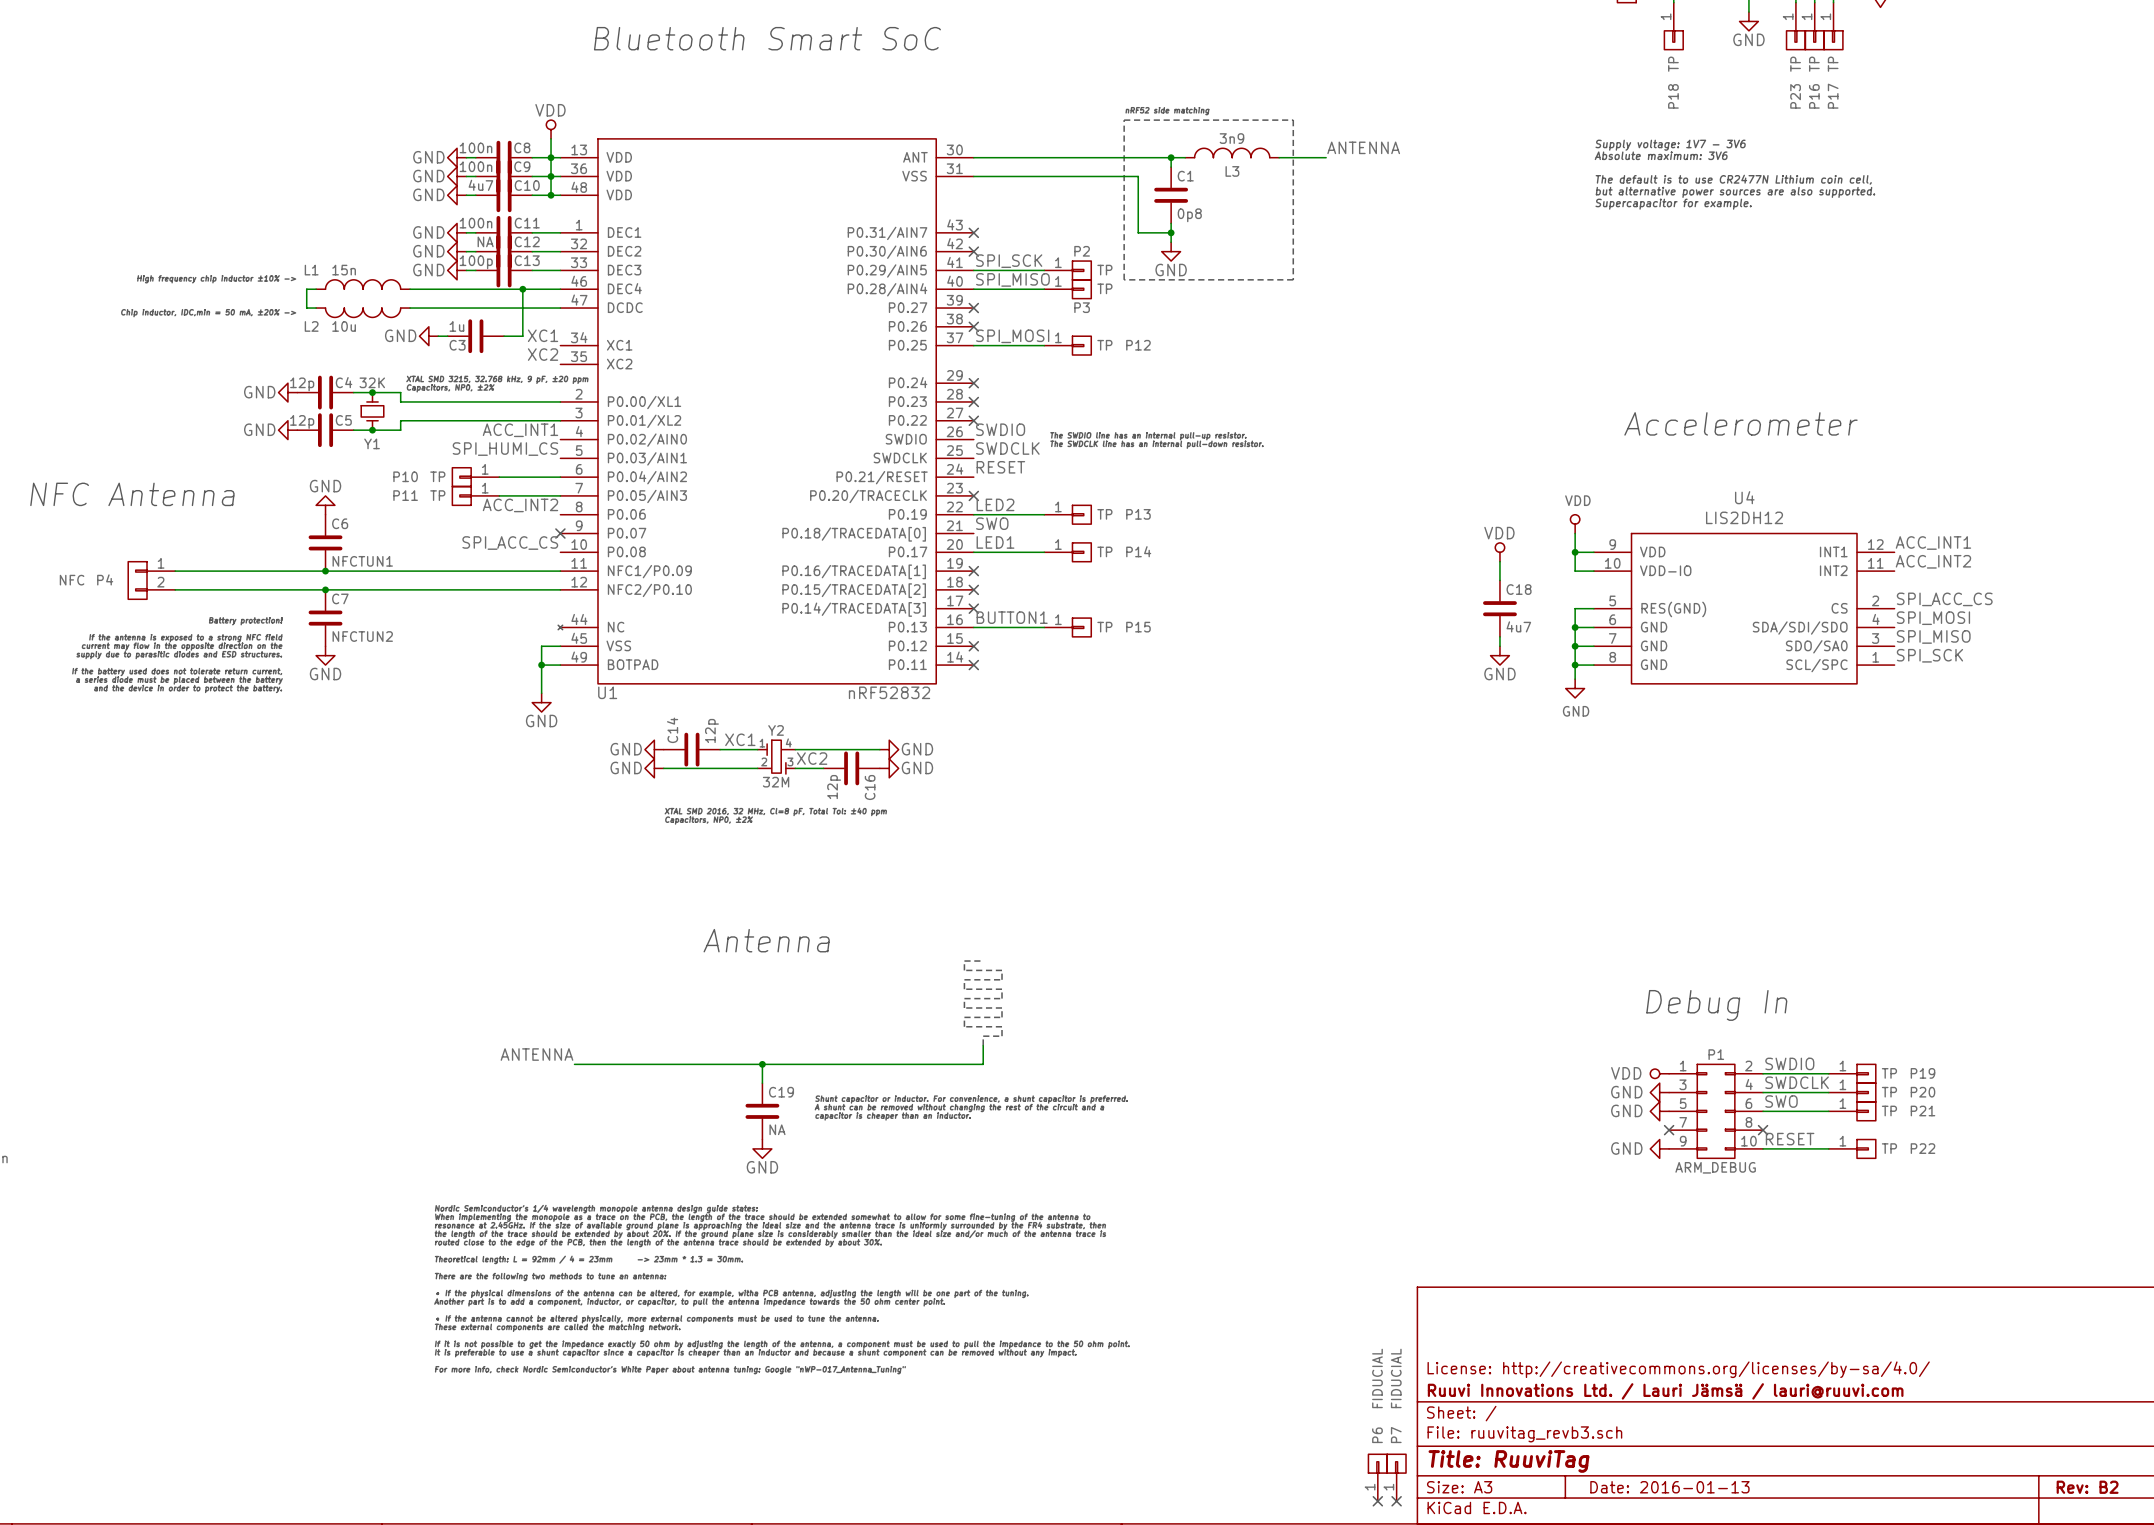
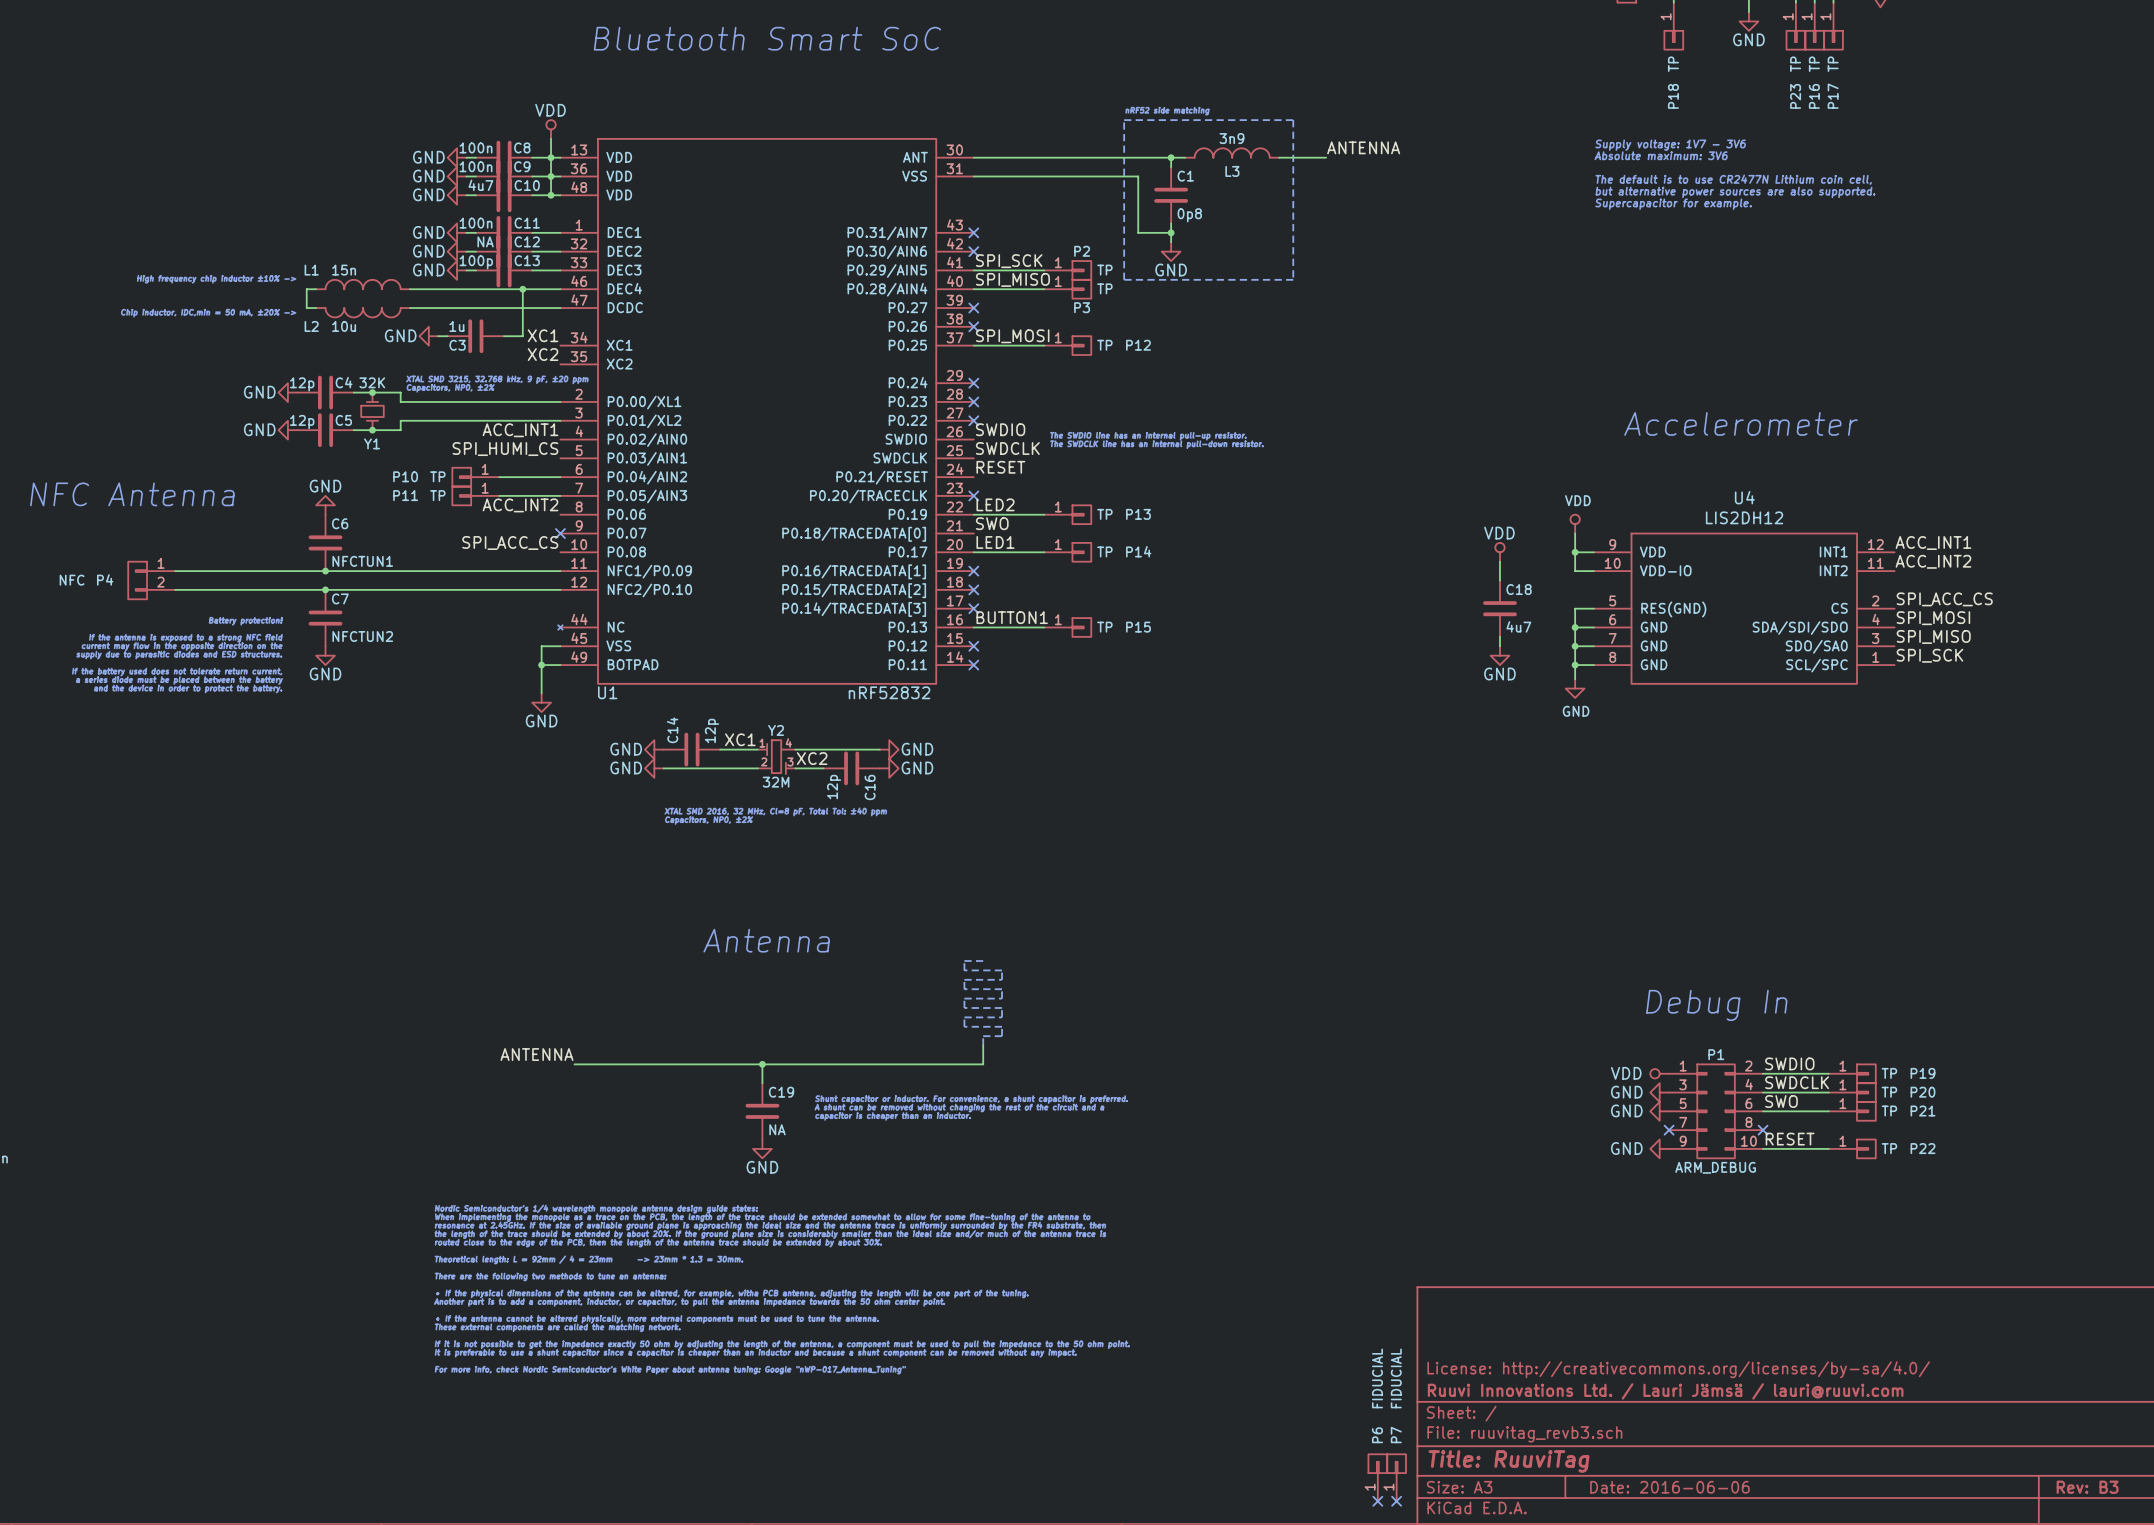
title block: Date: 2016-01-13 (1669, 1487) -> Date: 2016-06-06 (1669, 1487)
title block: Rev: B2 (2087, 1487) -> Rev: B3 (2087, 1487)

